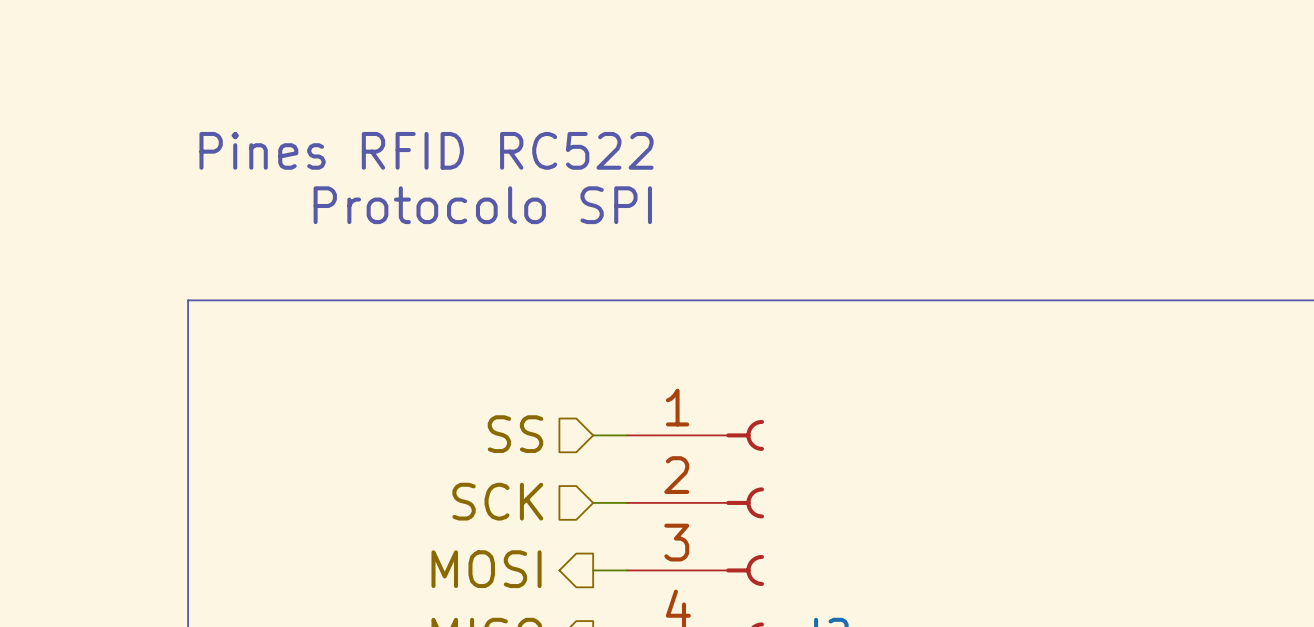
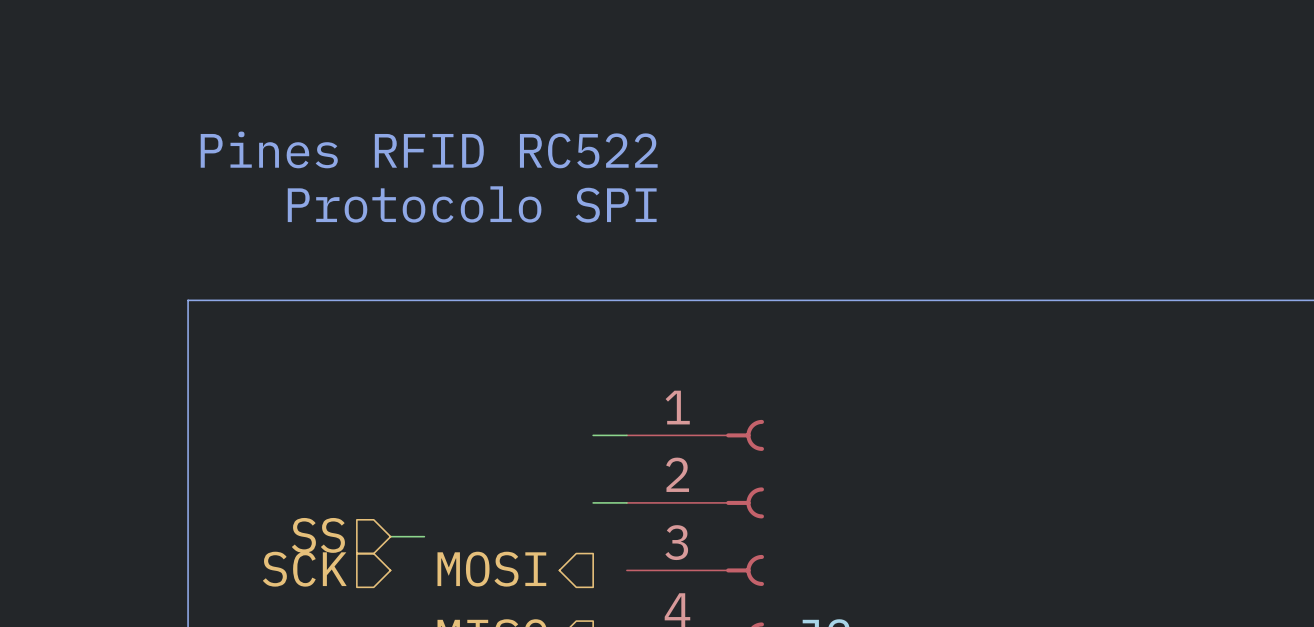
hierarchical label position: SS (515, 434) -> SS (318, 535)
hierarchical label position: SCK (497, 501) -> SCK (304, 569)
wire: (593, 570) (626, 570) -> (390, 536) (424, 536)

